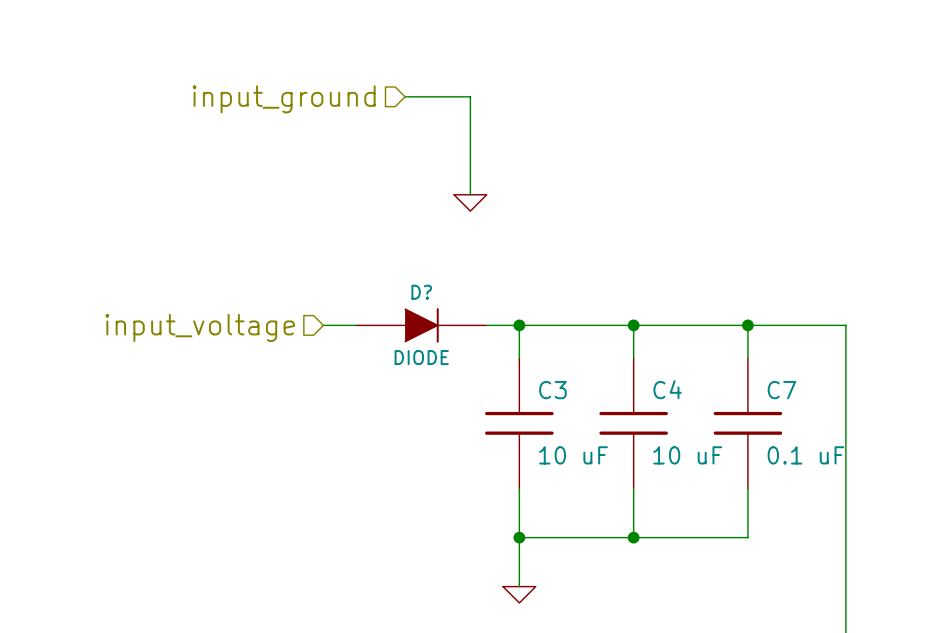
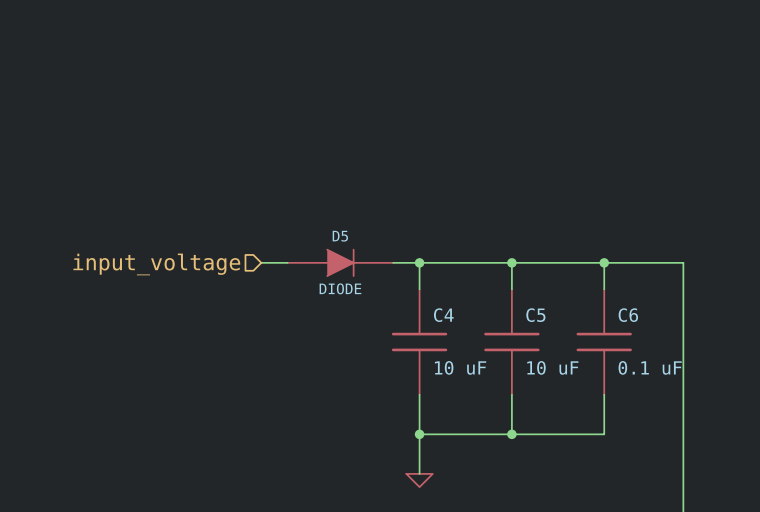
wire: (405, 96) (470, 96) (470, 194) -> none
hierarchical label: input_ground (284, 99) -> none
power symbol: (470, 202) -> none
D? name: D? (421, 292) -> D5 (340, 236)
C4 name: C4 (667, 389) -> C5 (535, 315)
C3 name: C3 (552, 390) -> C4 (443, 315)
C7 name: C7 (781, 390) -> C6 (628, 315)

